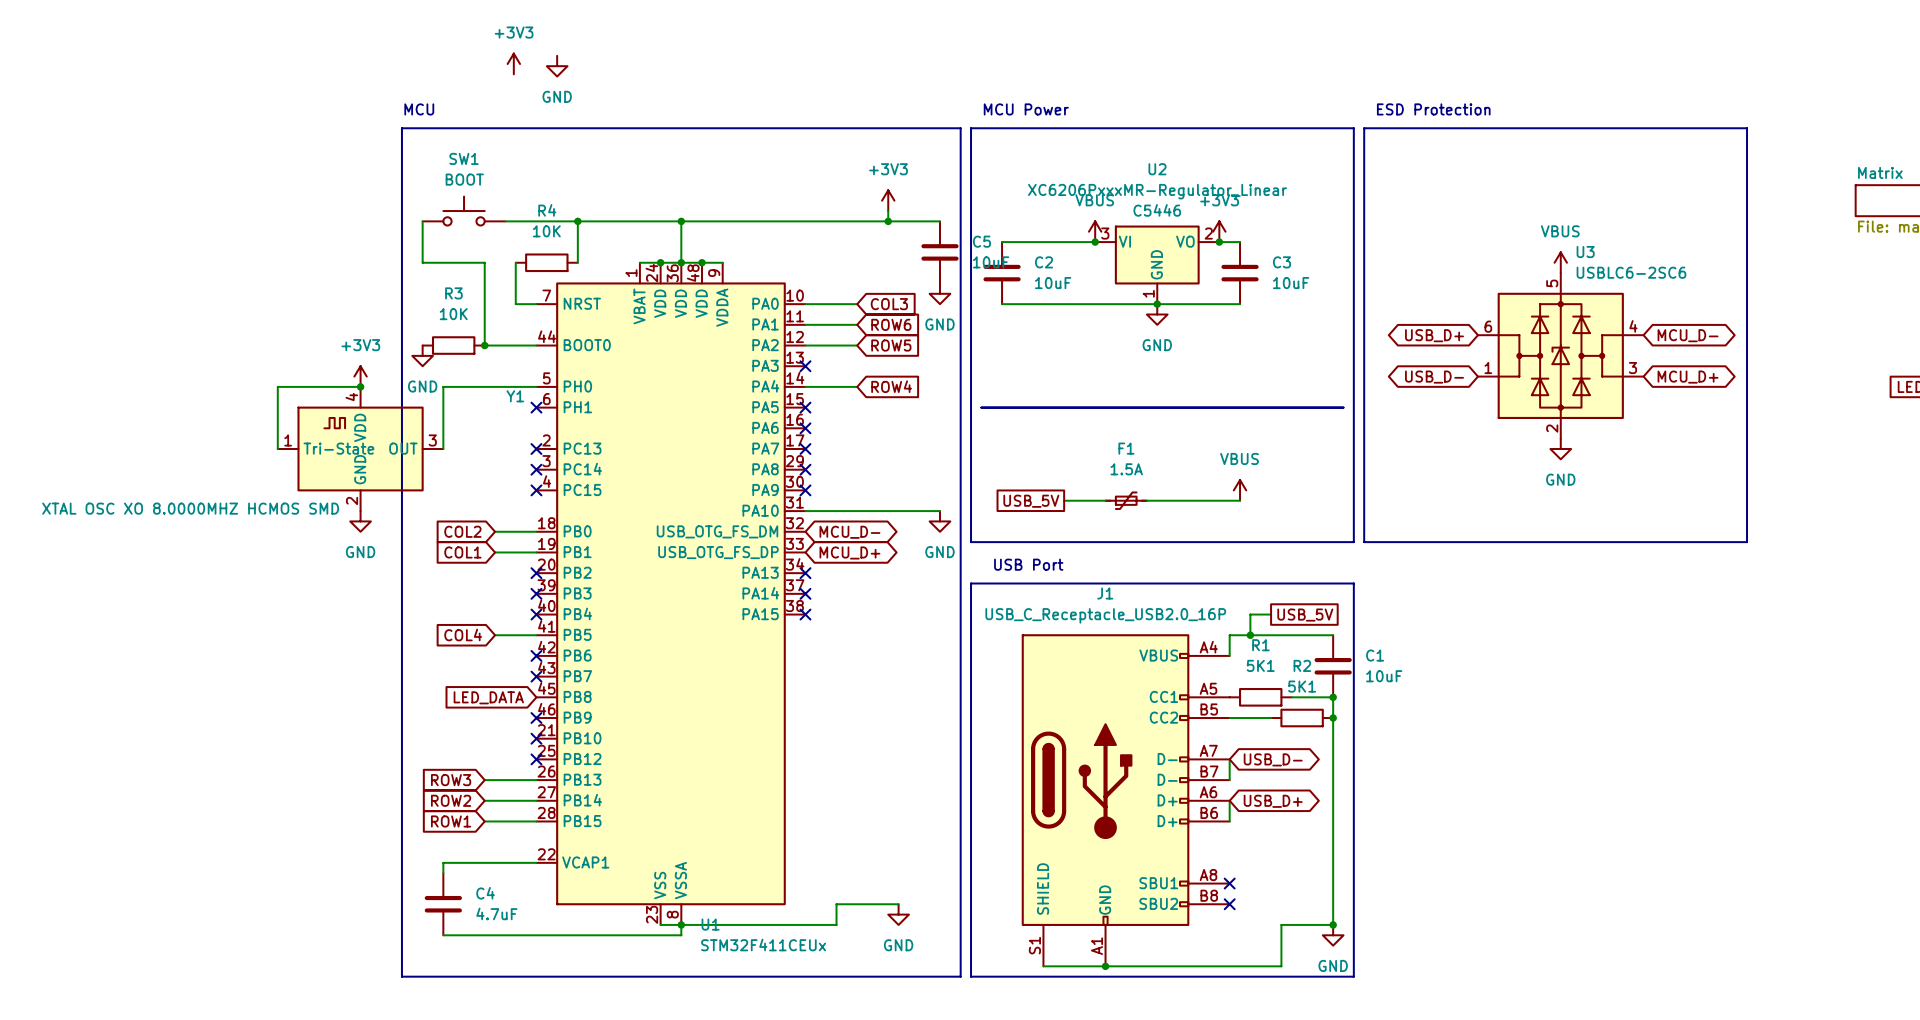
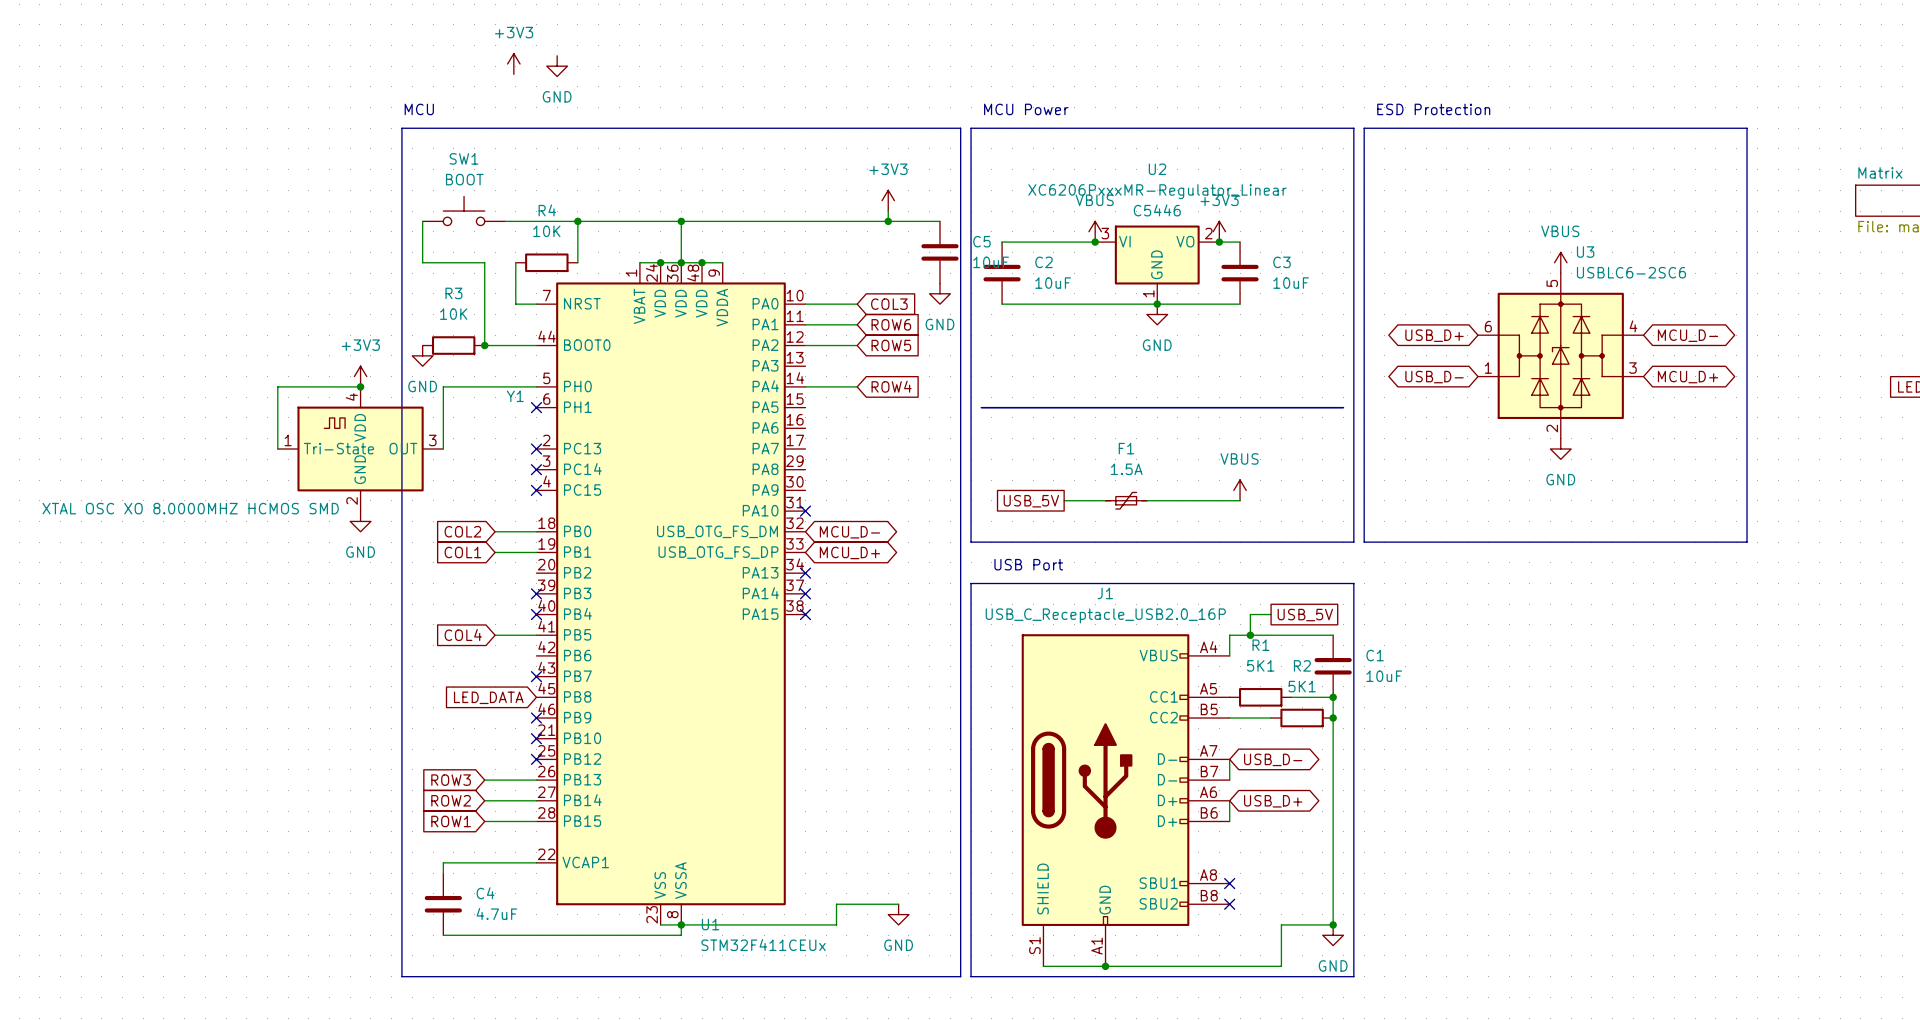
no-connect mark: (805, 366) -> none
no-connect mark: (805, 407) -> none
no-connect mark: (805, 428) -> none
no-connect mark: (805, 449) -> none
no-connect mark: (805, 469) -> none
no-connect mark: (805, 490) -> none
wire: (805, 511) (939, 511) -> none
no-connect mark: none -> (805, 511)
power symbol: GND (939, 521) -> none
no-connect mark: (536, 573) -> none
no-connect mark: (536, 655) -> none

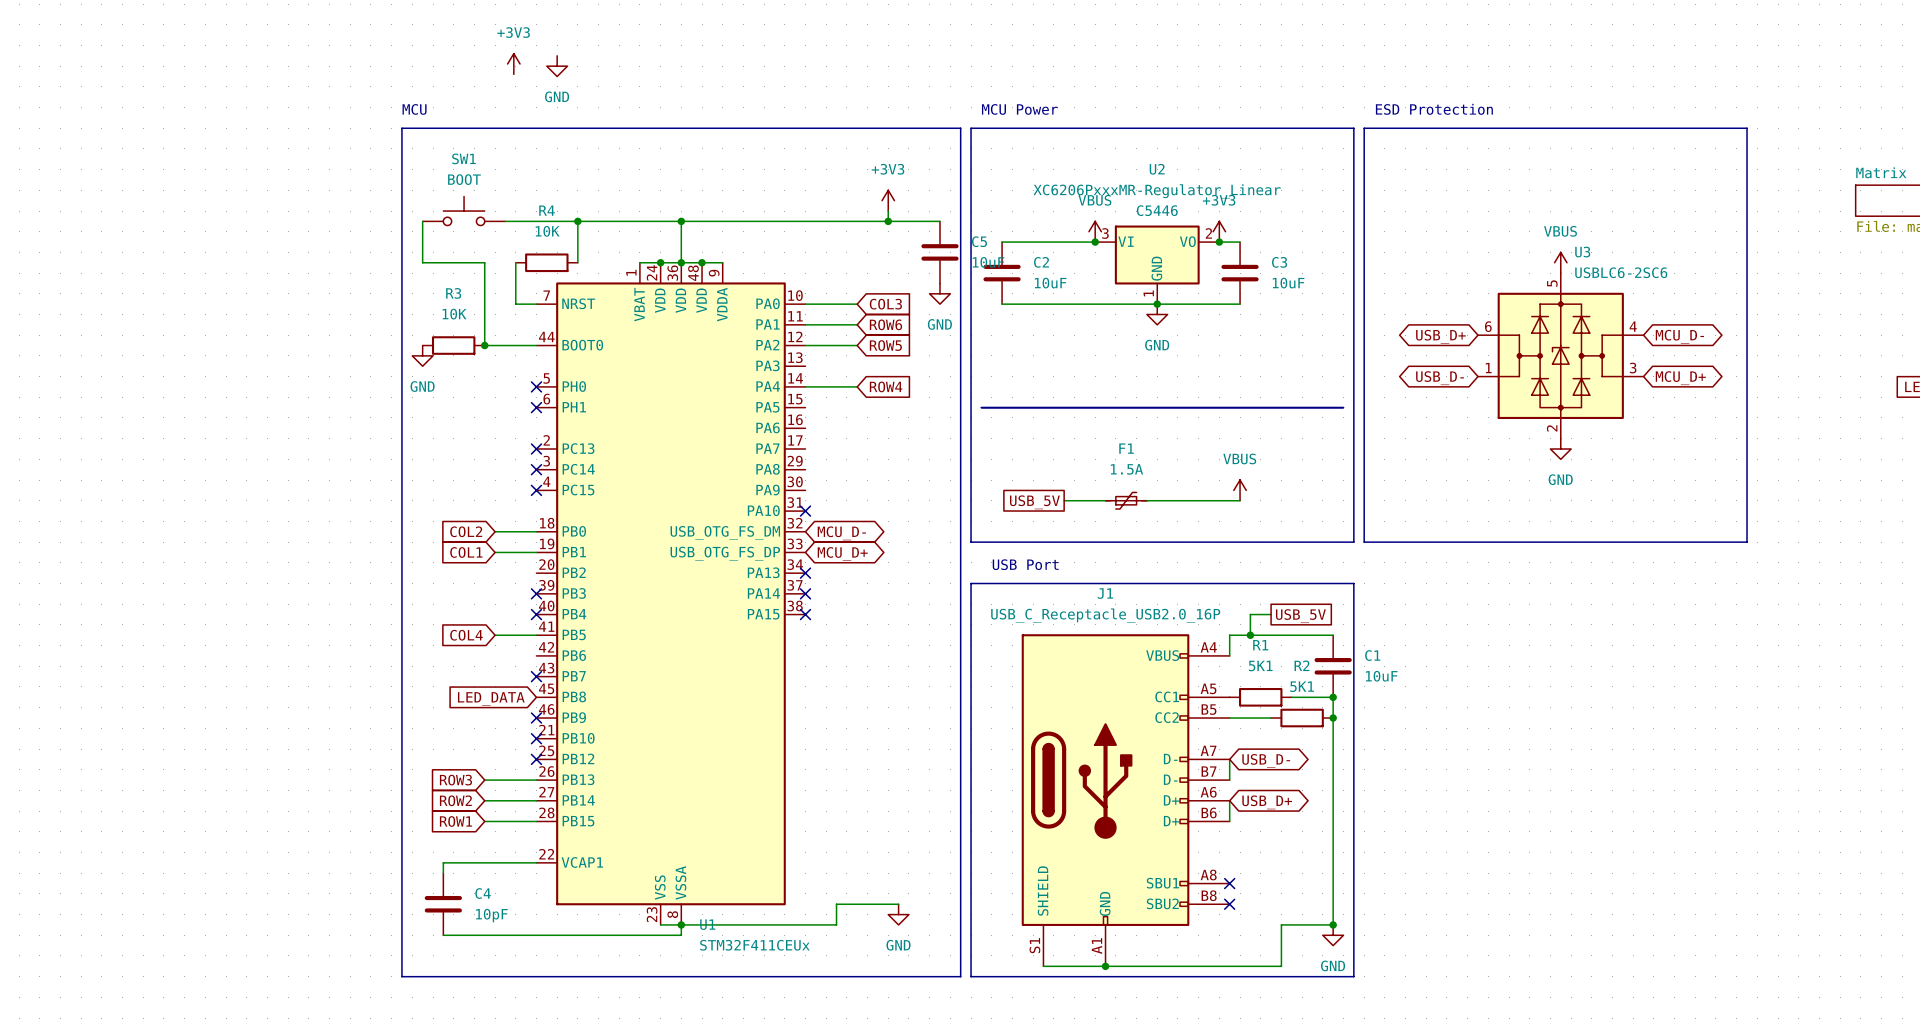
power symbol: +3V3 (360, 376) -> none
wire: (360, 386) (277, 386) (277, 449) -> none
junction: (360, 386) -> none
wire: (536, 386) (443, 386) (443, 449) -> none
no-connect mark: none -> (536, 386)
Y1: XTAL OSC XO 8.0000MHZ HCMOS SMD (360, 449) -> none
power symbol: GND (360, 521) -> none
C4 value: 4.7uF (496, 913) -> 10pF (491, 915)

